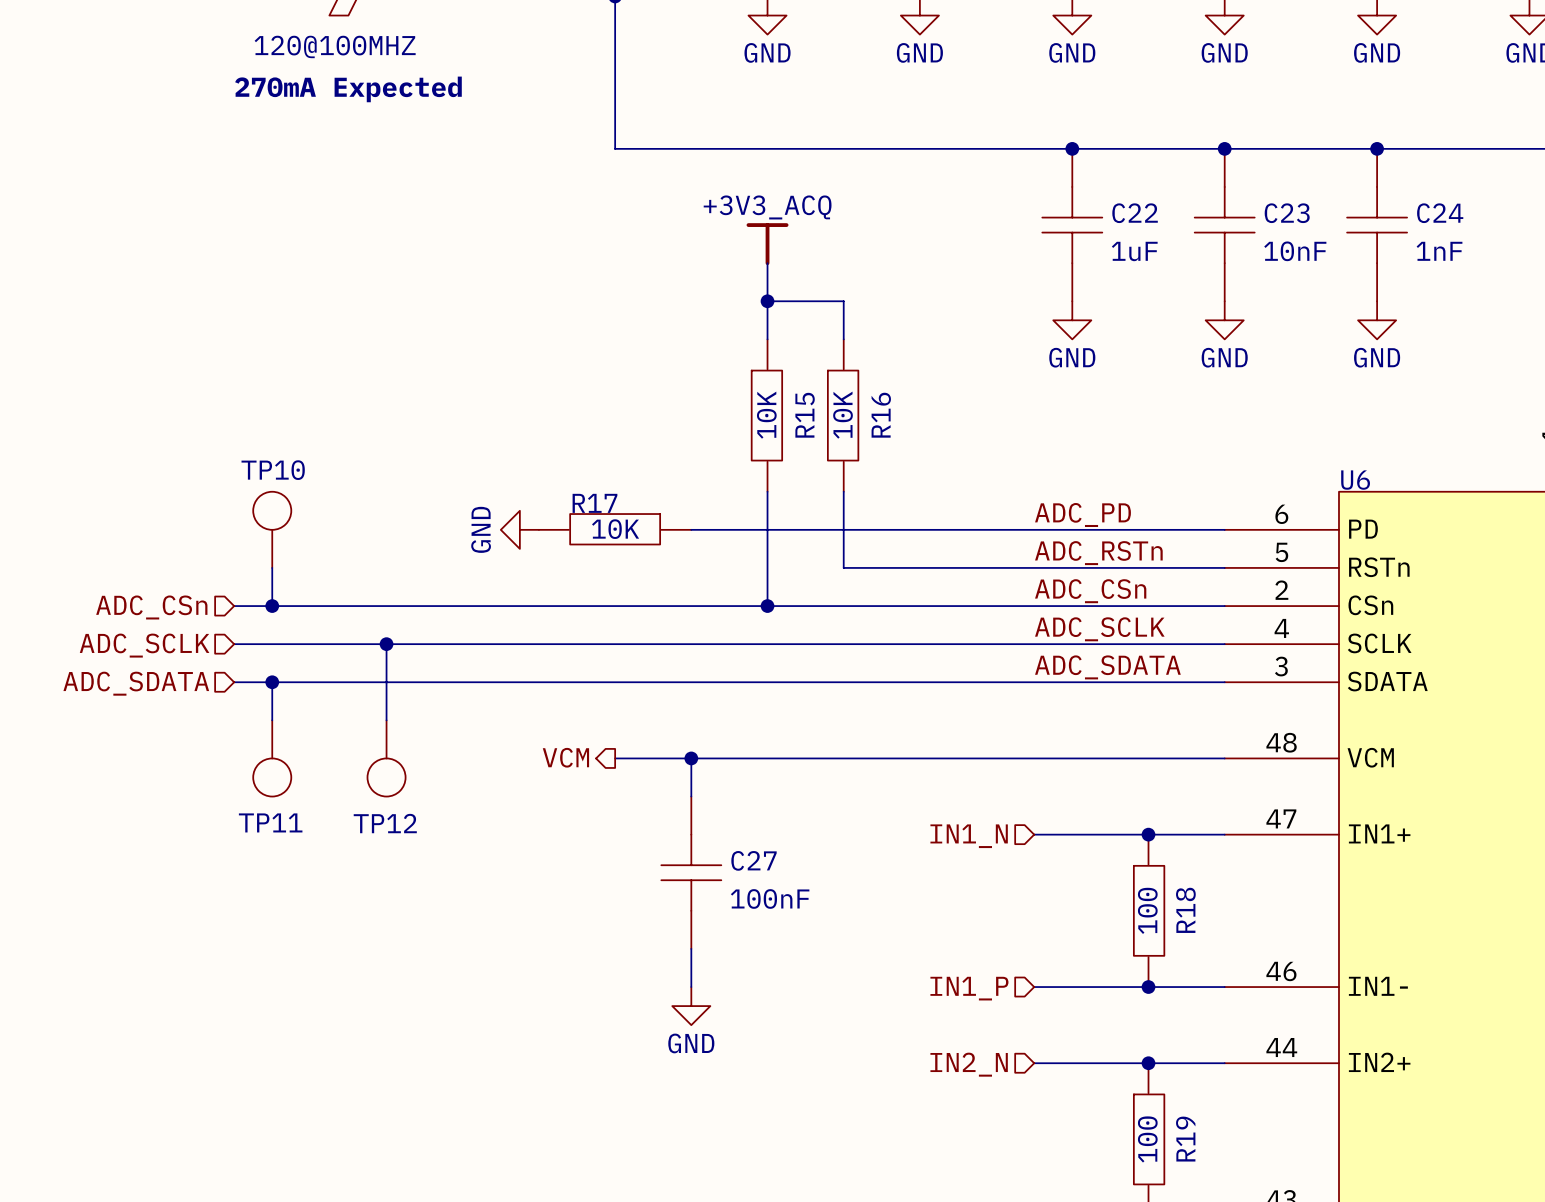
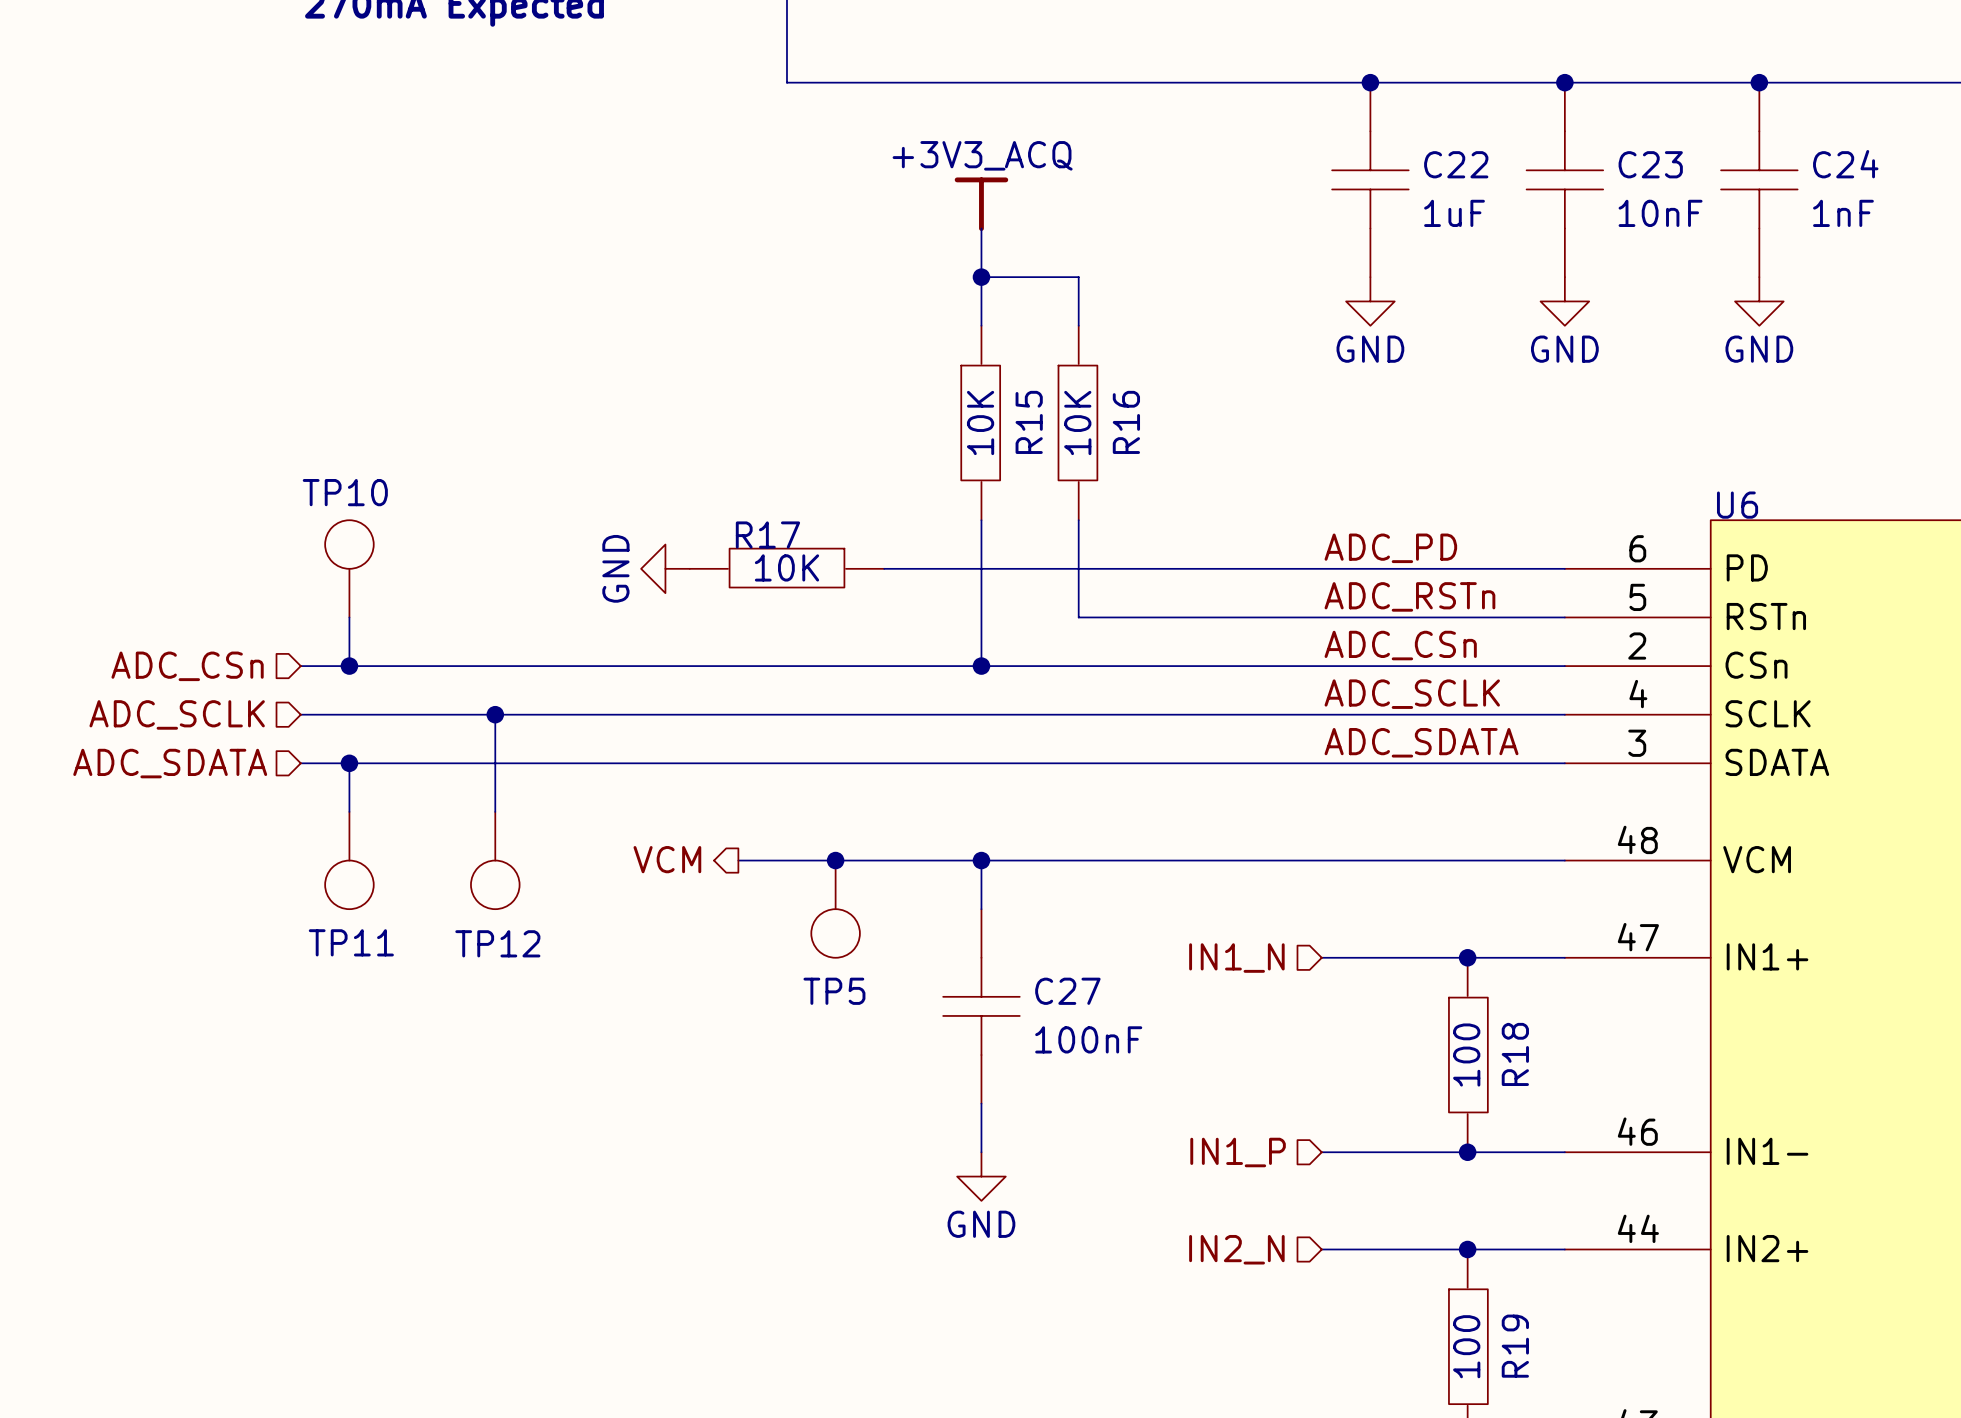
hierarchical label position: VCM (565, 757) -> VCM (667, 859)
wire: none -> (738, 860) (786, 860)
junction: none -> (835, 860)
wire: (691, 758) (691, 796) -> (981, 860) (981, 909)
junction: (691, 758) -> none
junction: none -> (981, 860)
TP5: none -> (835, 909)
C27 position: (691, 872) -> (981, 1006)
wire: (691, 948) (691, 987) -> (981, 1103) (981, 1152)
power symbol position: GND (691, 1006) -> GND (981, 1176)

